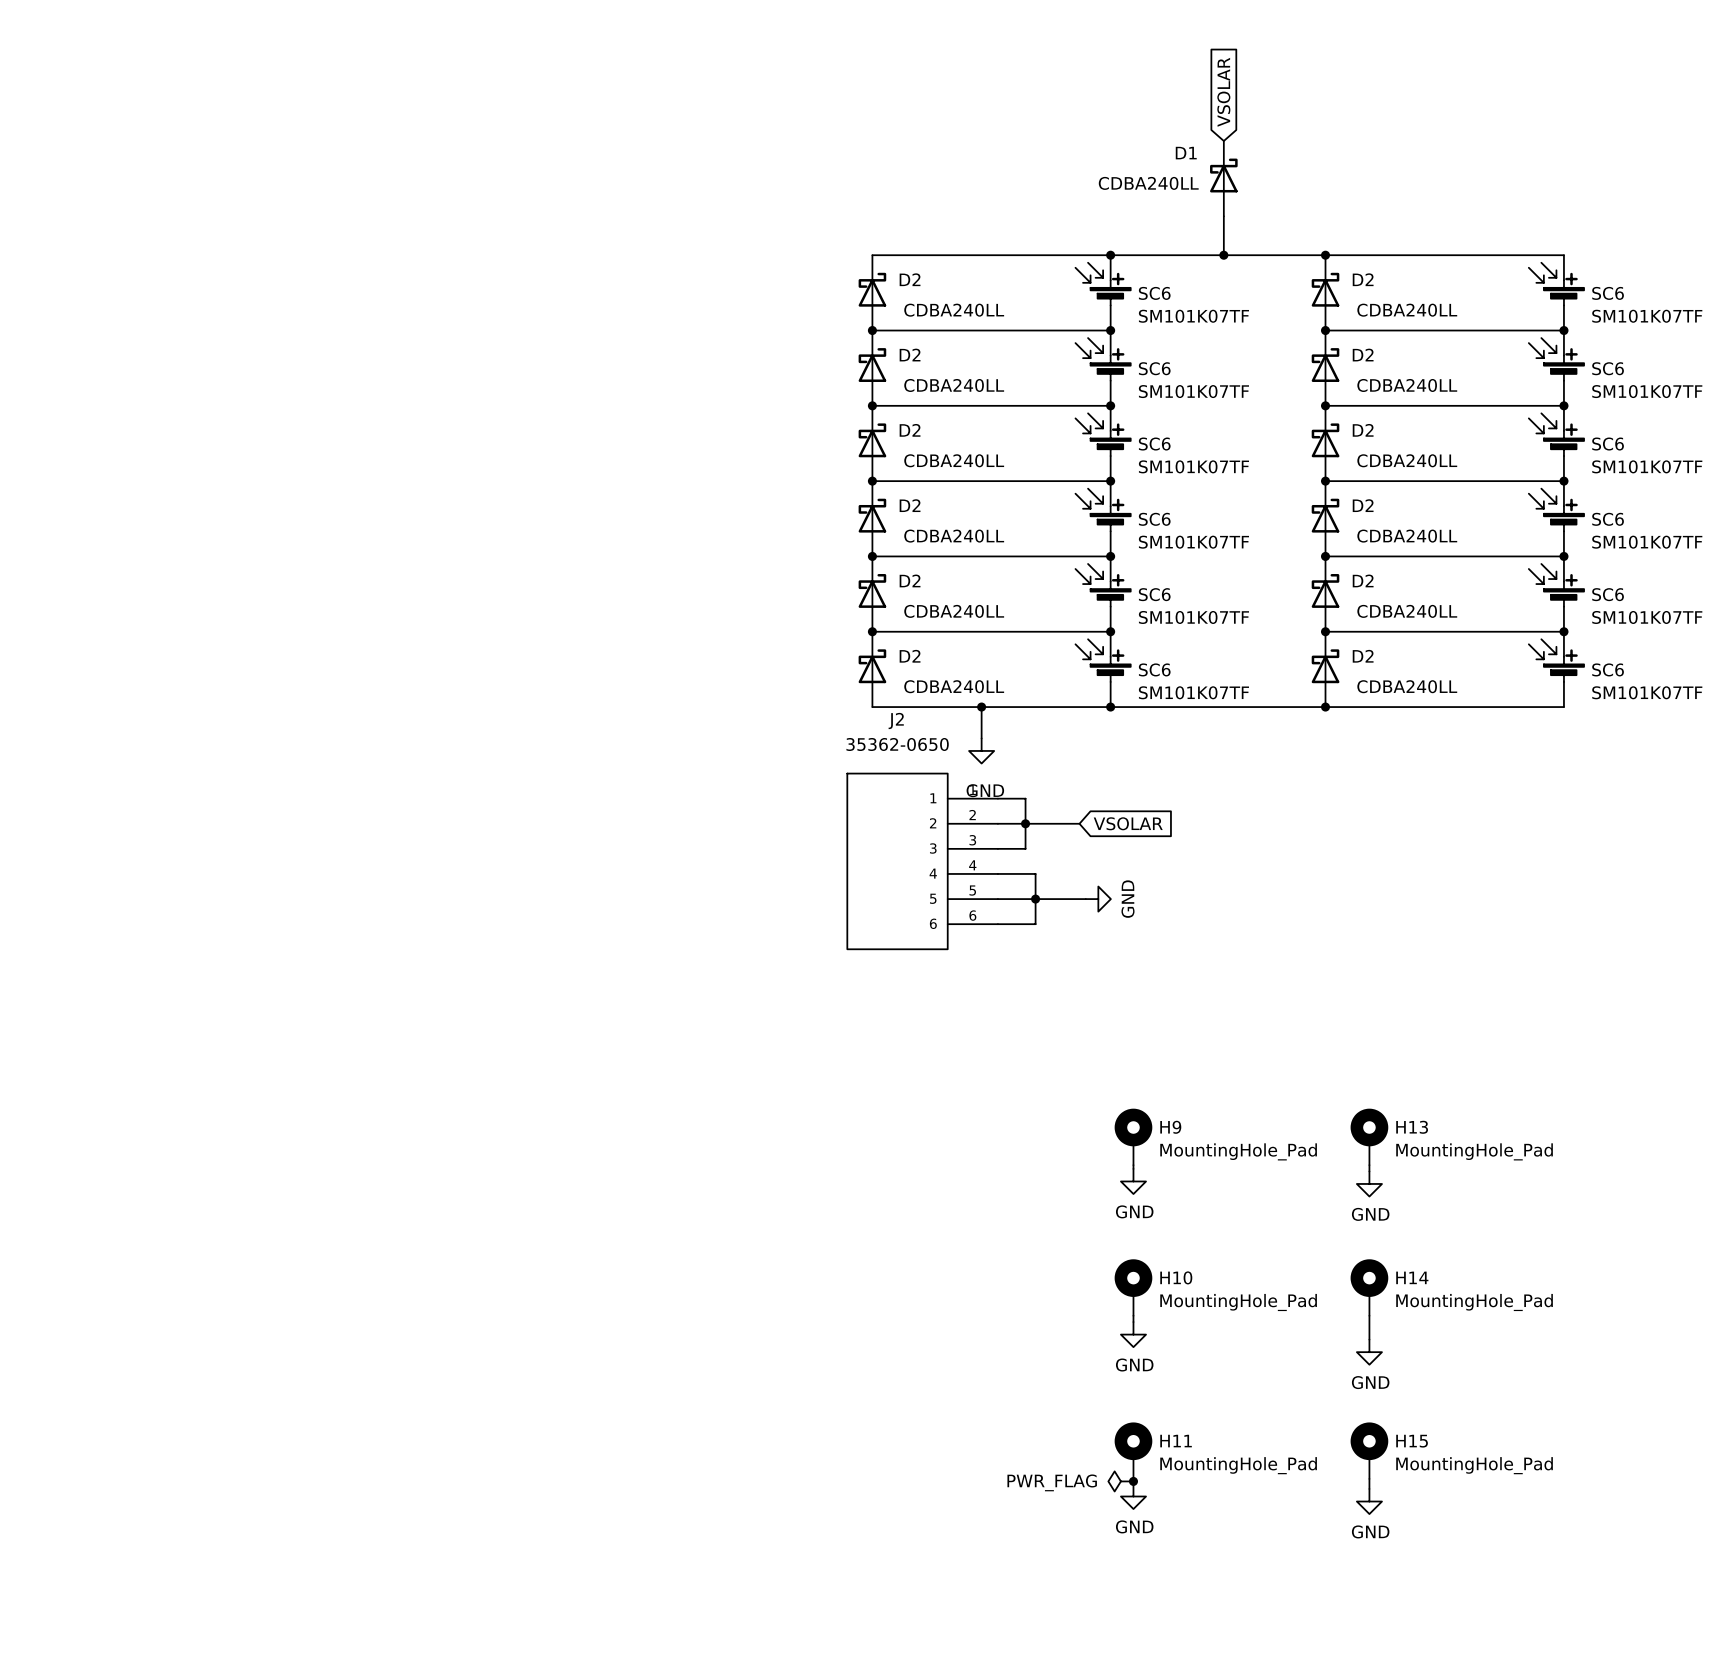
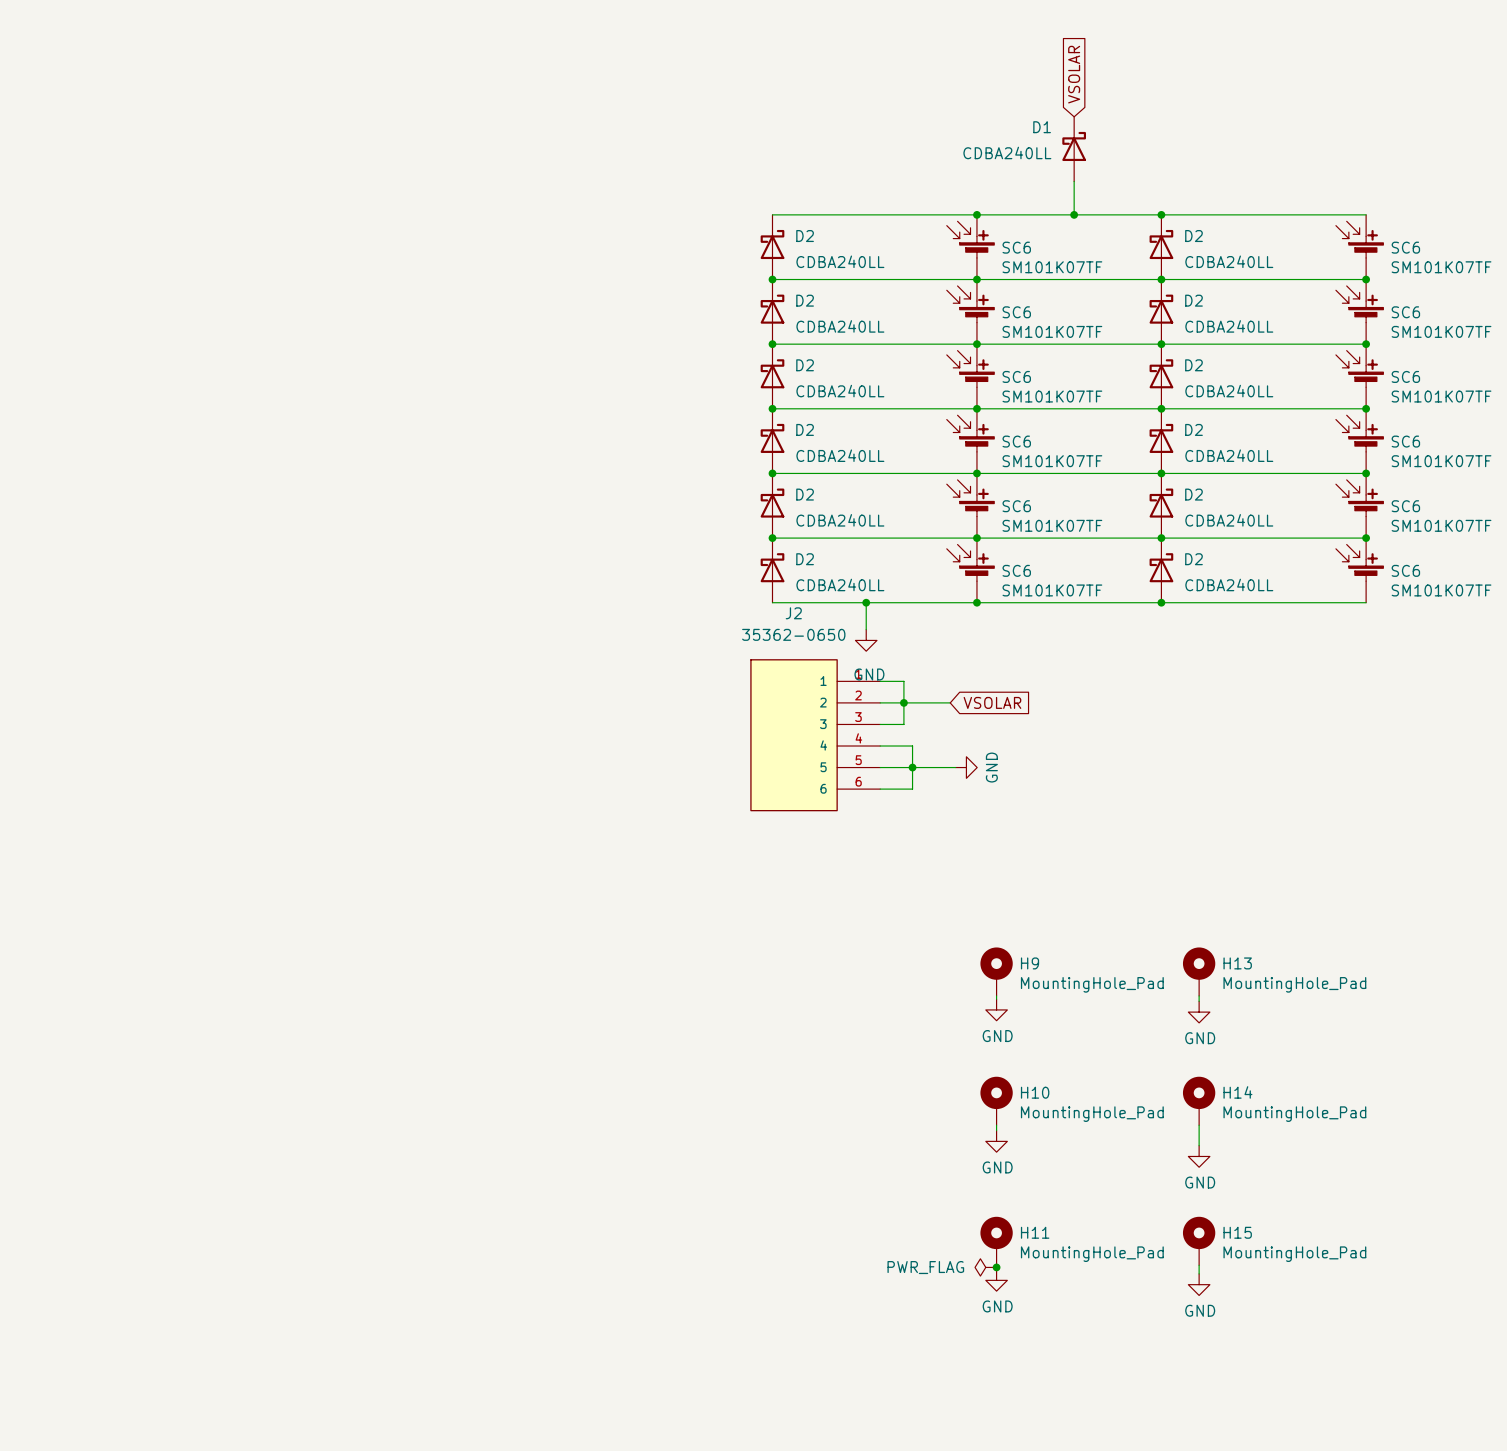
wire: none -> (976, 279) (1161, 279)
wire: none -> (976, 344) (1161, 344)
wire: none -> (976, 408) (1161, 408)
wire: none -> (976, 473) (1161, 473)
wire: none -> (976, 538) (1161, 538)

